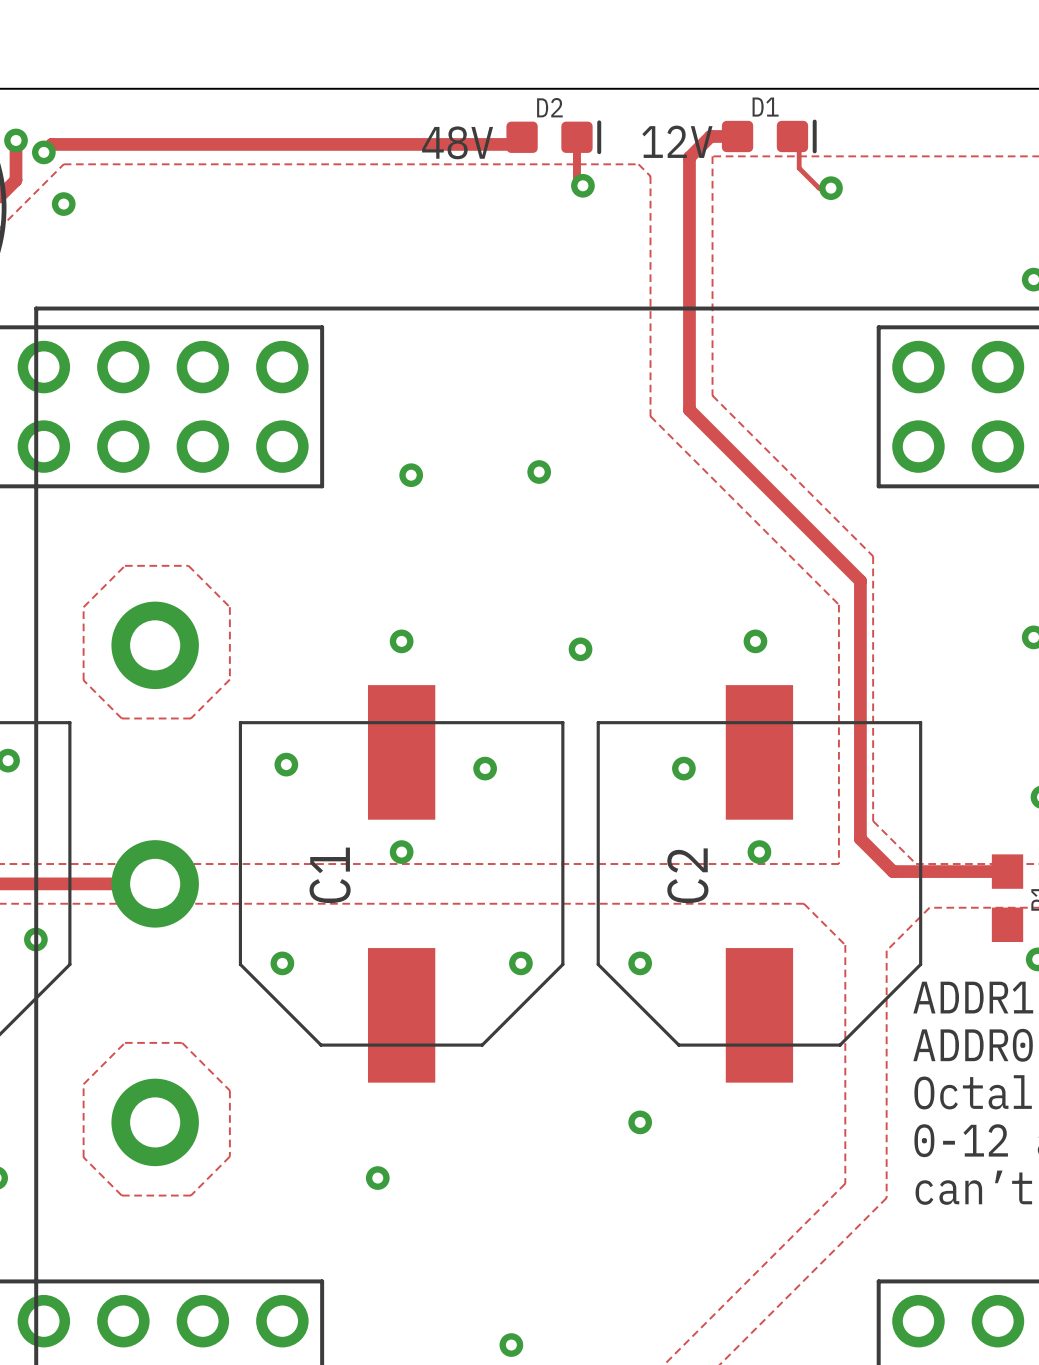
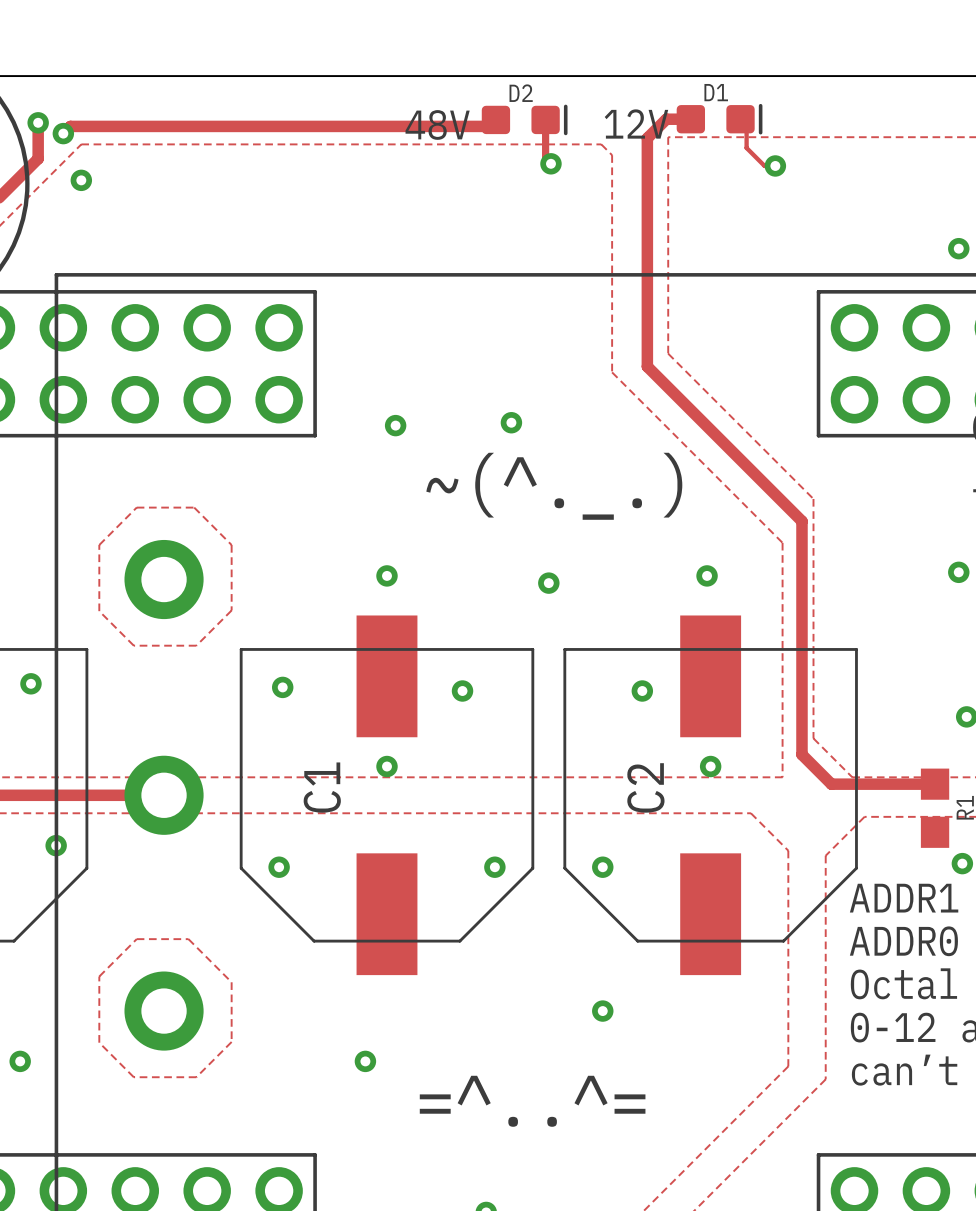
text: none -> ~(^._.) (554, 486)
text: none -> =^..^= (532, 1101)

